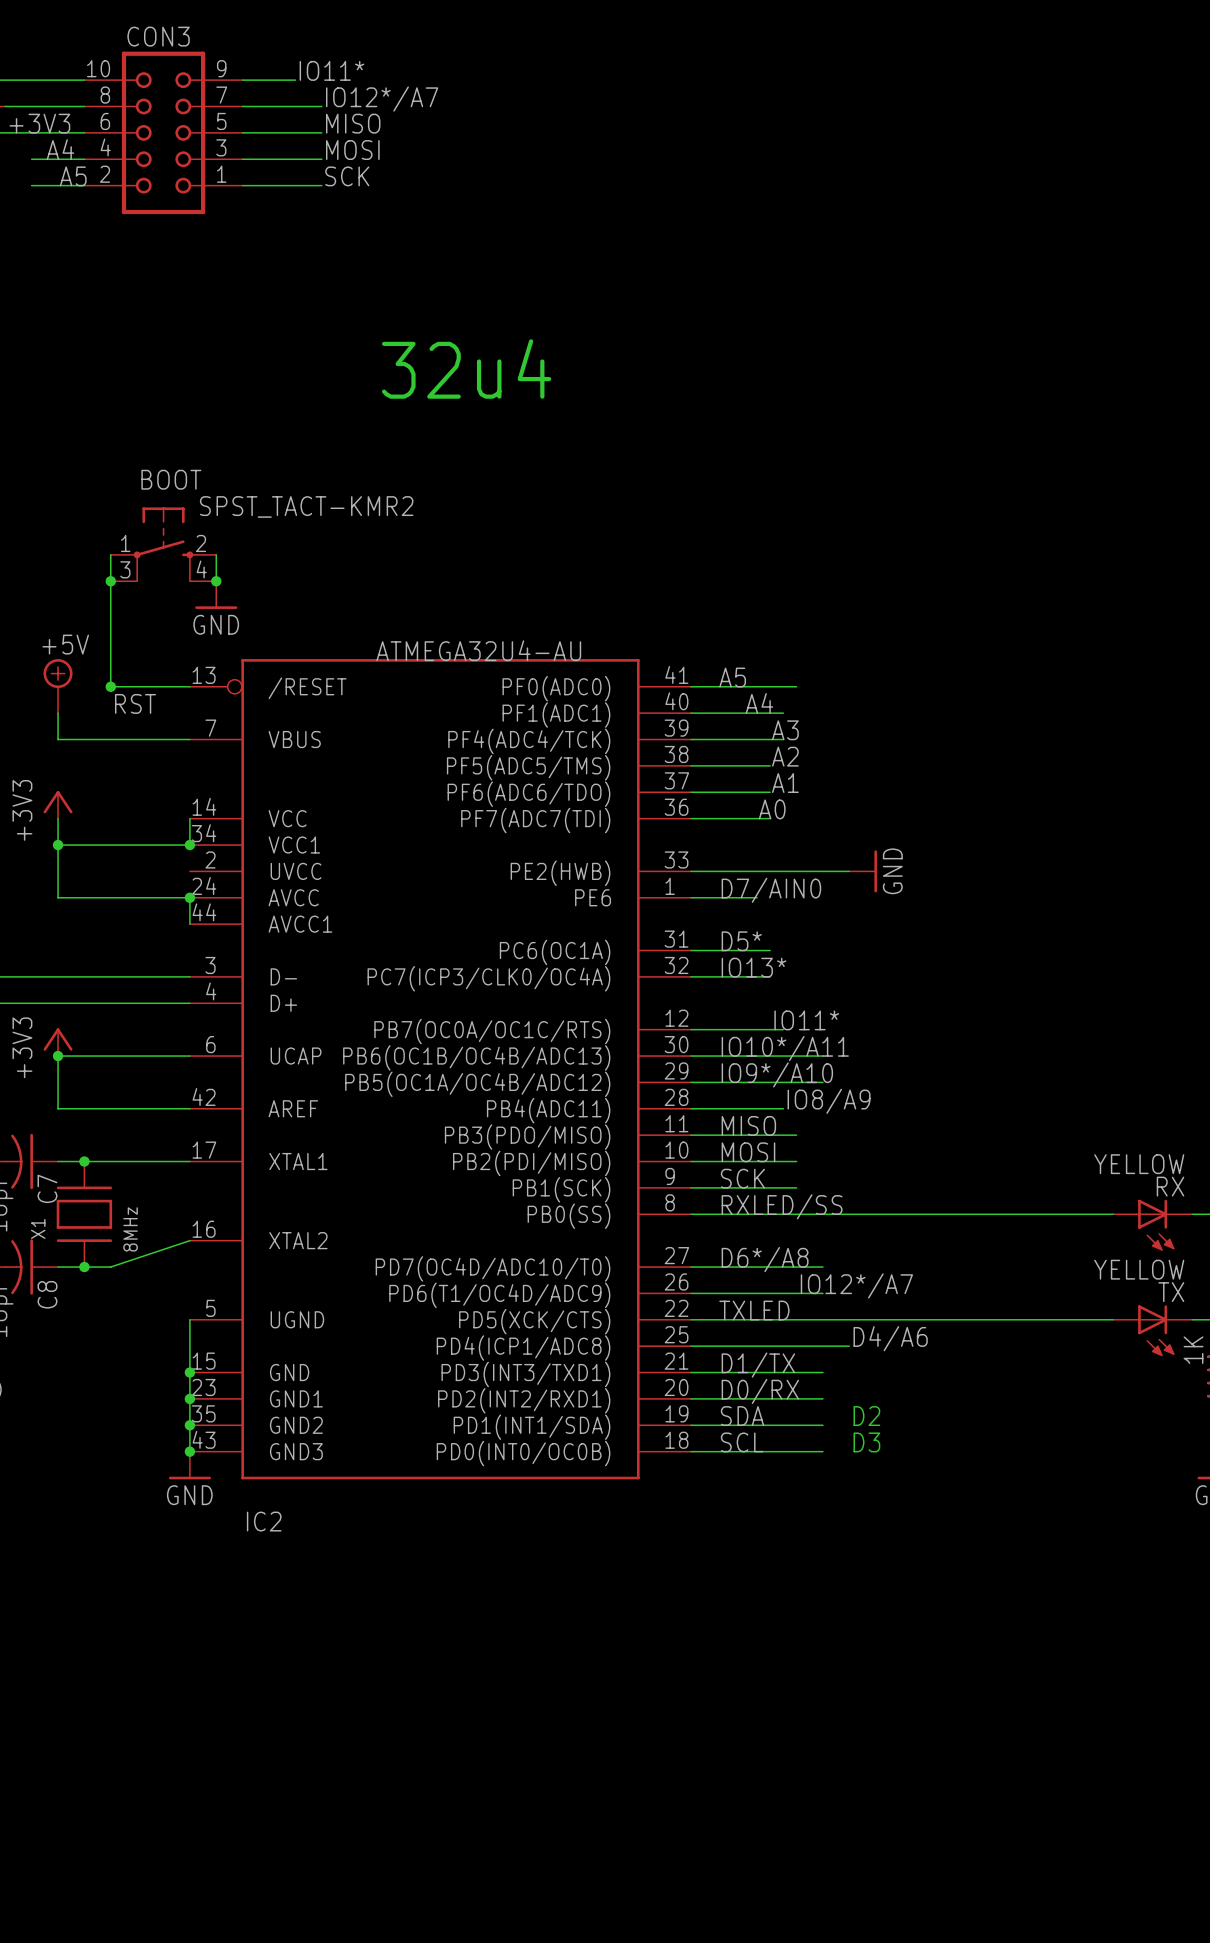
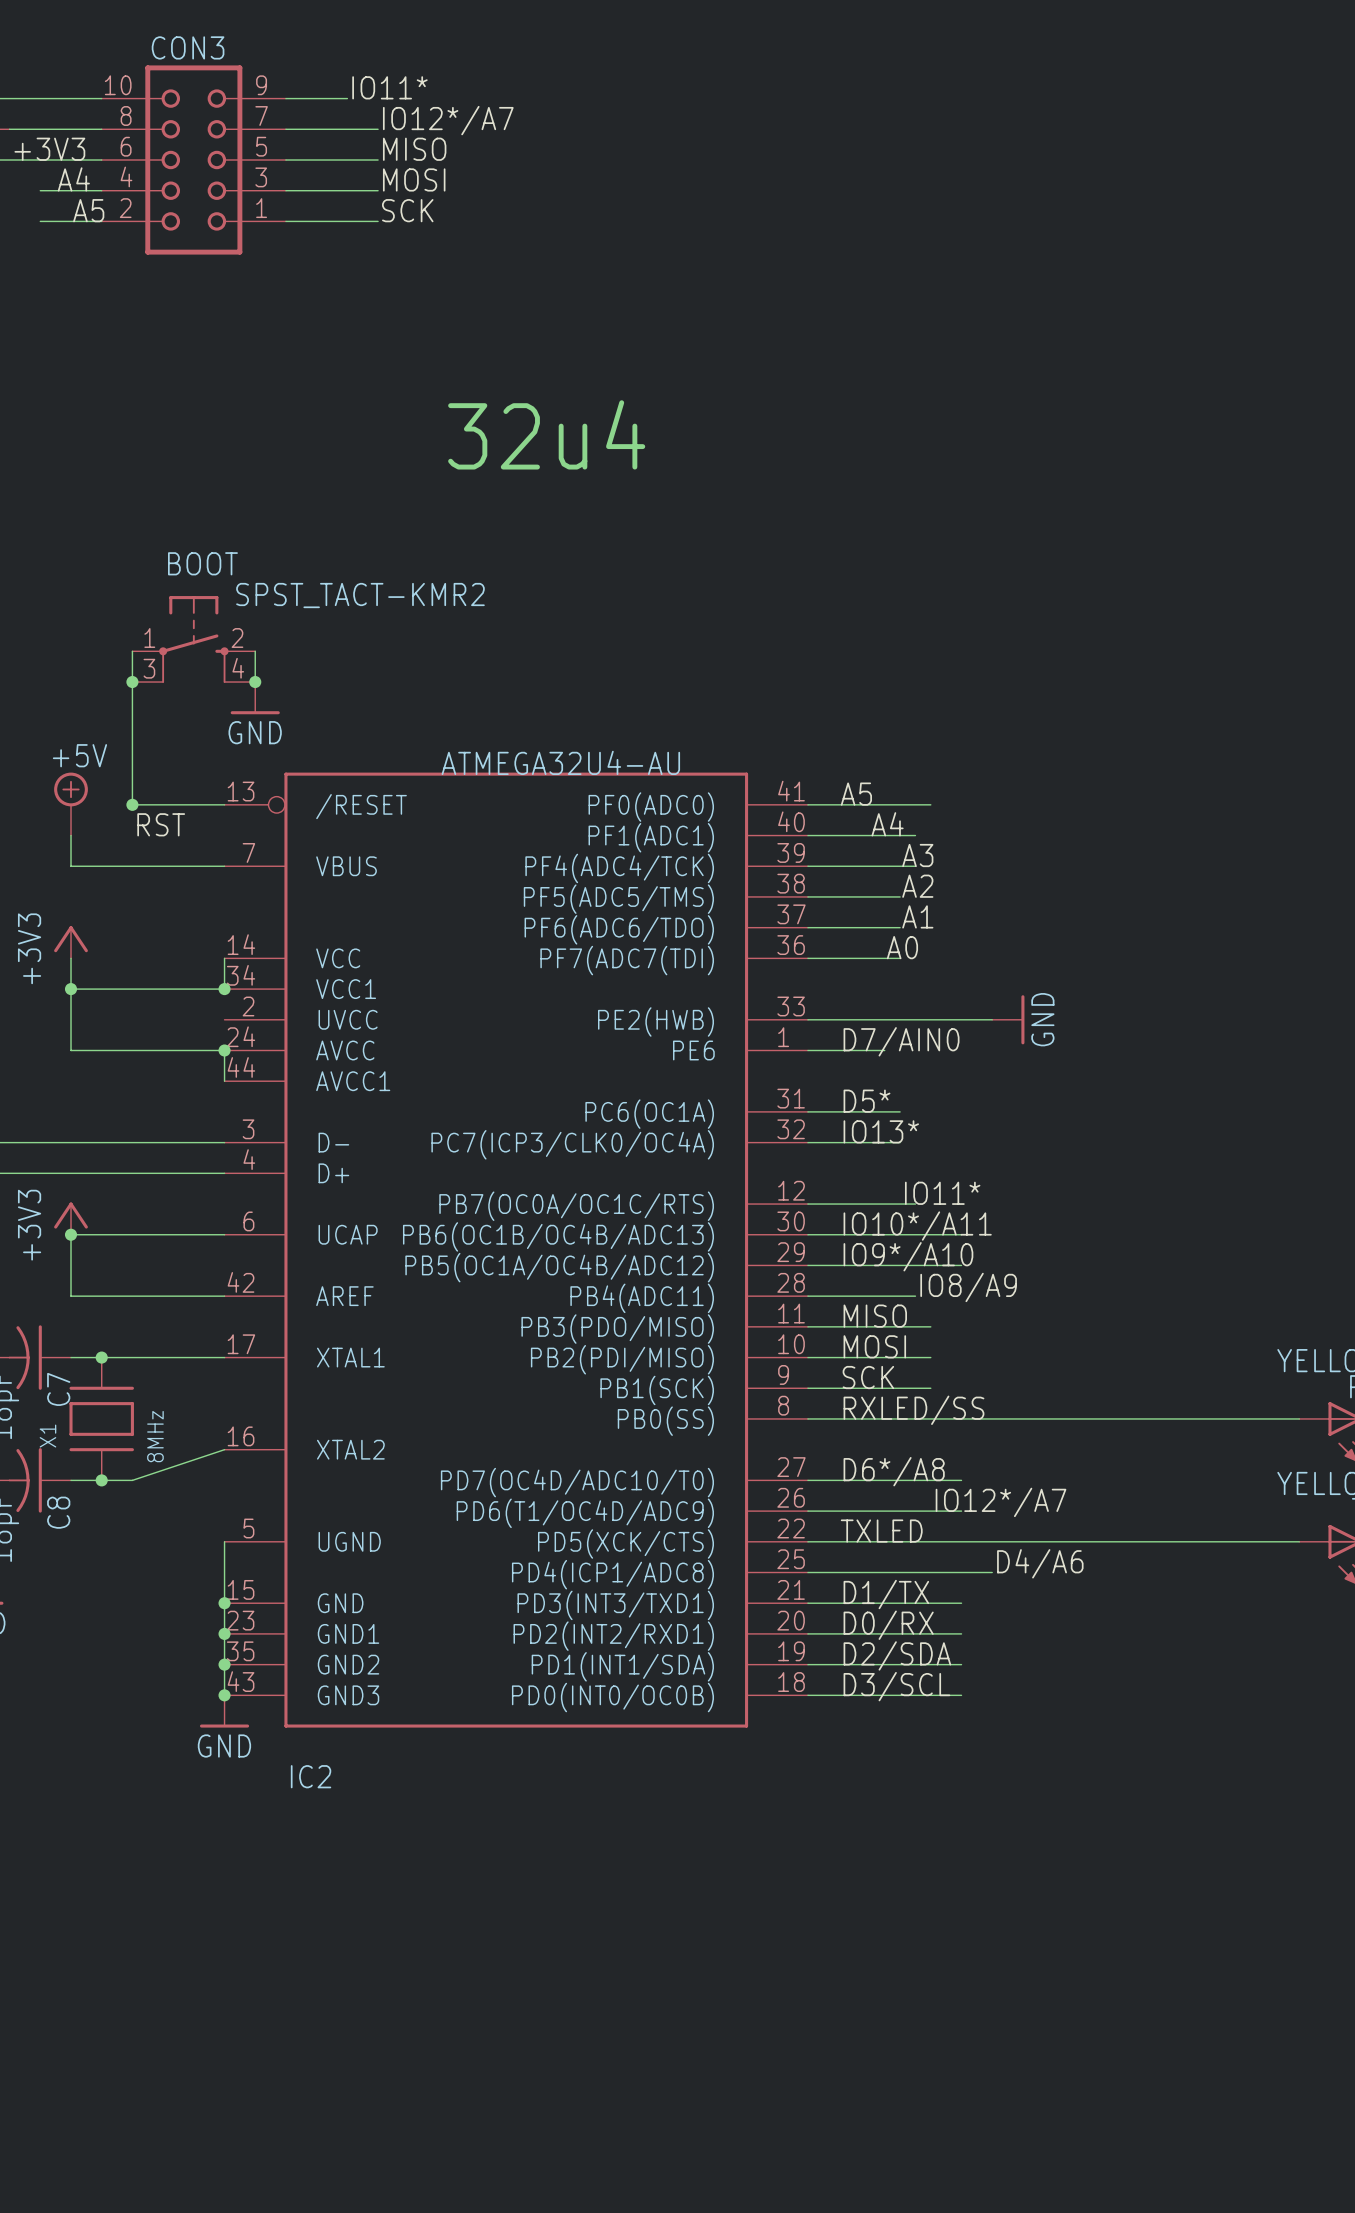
label: SDA (742, 1416) -> D2/SDA (897, 1655)
text: D2 (866, 1416) -> none
label: SCL (742, 1442) -> D3/SCL (896, 1686)
text: D3 (866, 1442) -> none

